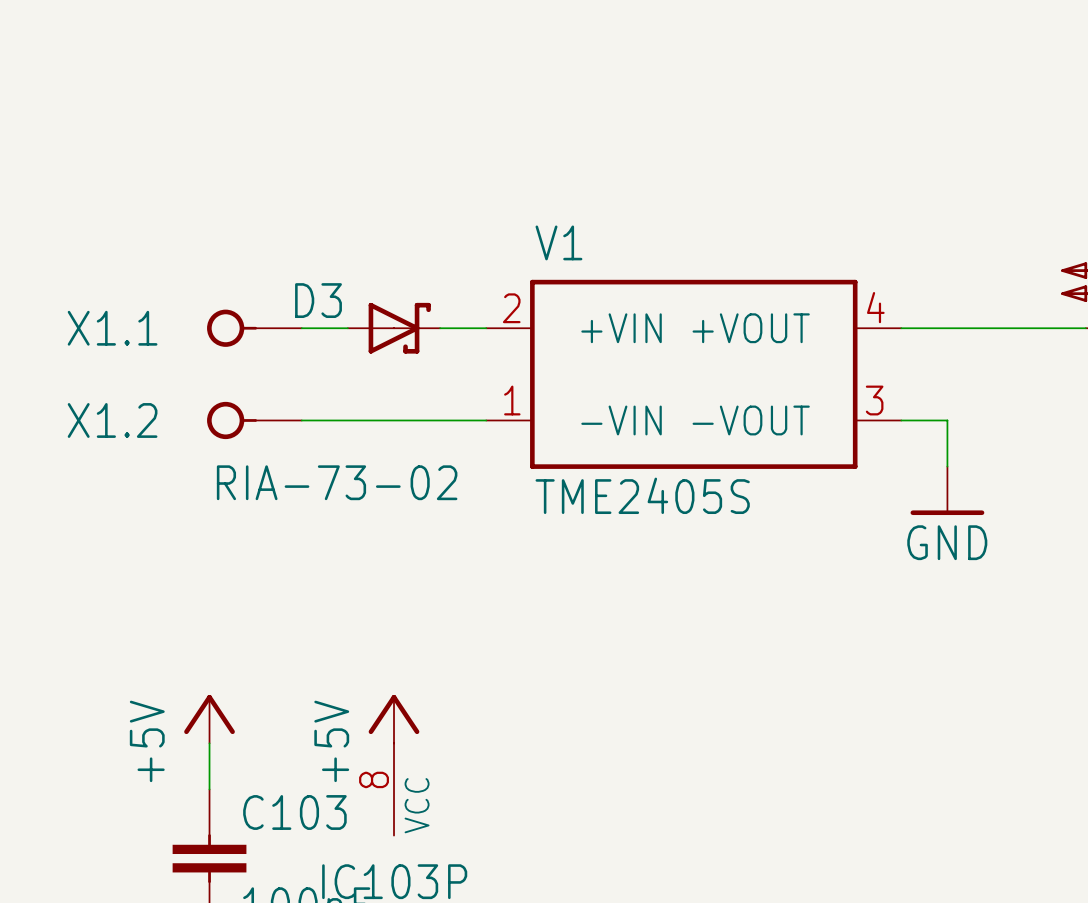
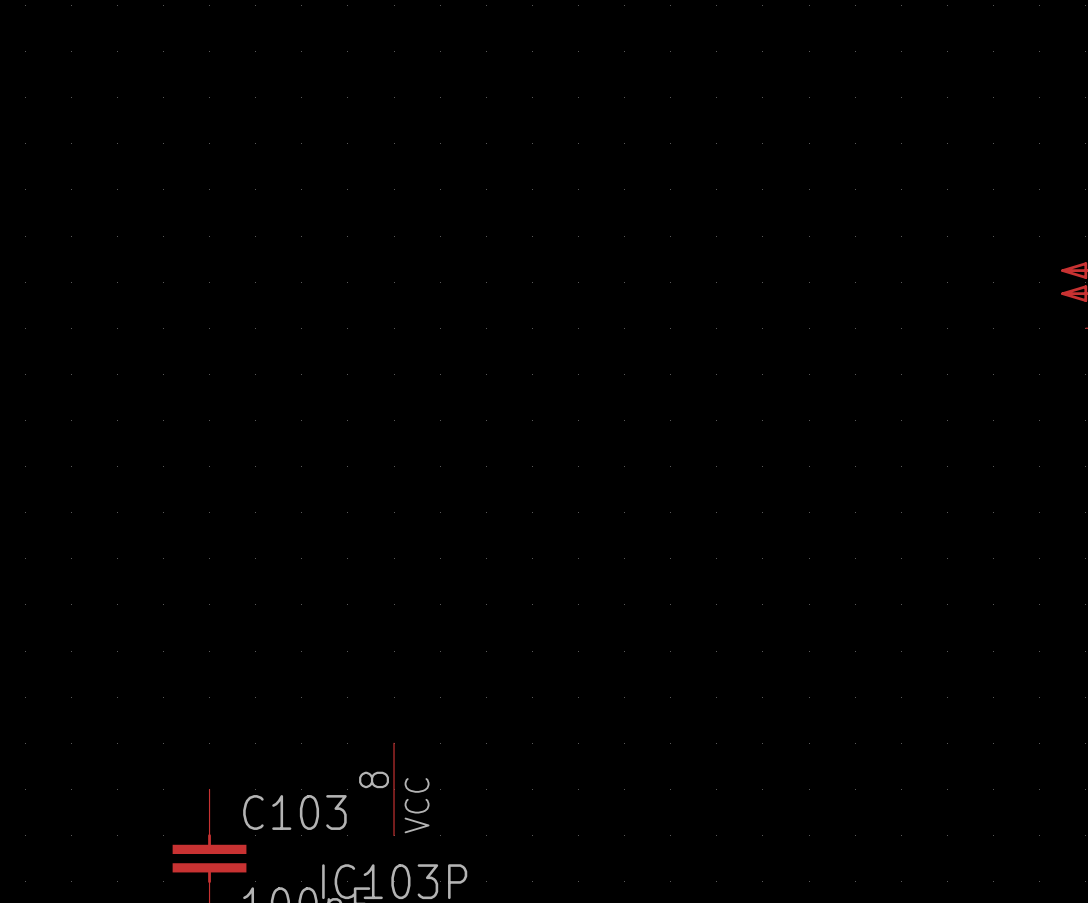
X1.1: (254, 328) -> none
wire: (301, 328) (347, 328) -> none
D3: (394, 328) -> none
wire: (440, 328) (486, 328) -> none
wire: (901, 328) (1085, 328) -> none
V1: TME2405S (693, 374) -> none
X1.2: RIA-73-02 (254, 420) -> none
wire: (301, 420) (486, 420) -> none
wire: (901, 420) (947, 420) (947, 466) -> none
power symbol: GND (947, 490) -> none
power symbol: +5V (209, 719) -> none
power symbol: +5V (394, 719) -> none
wire: (209, 743) (209, 789) -> none

